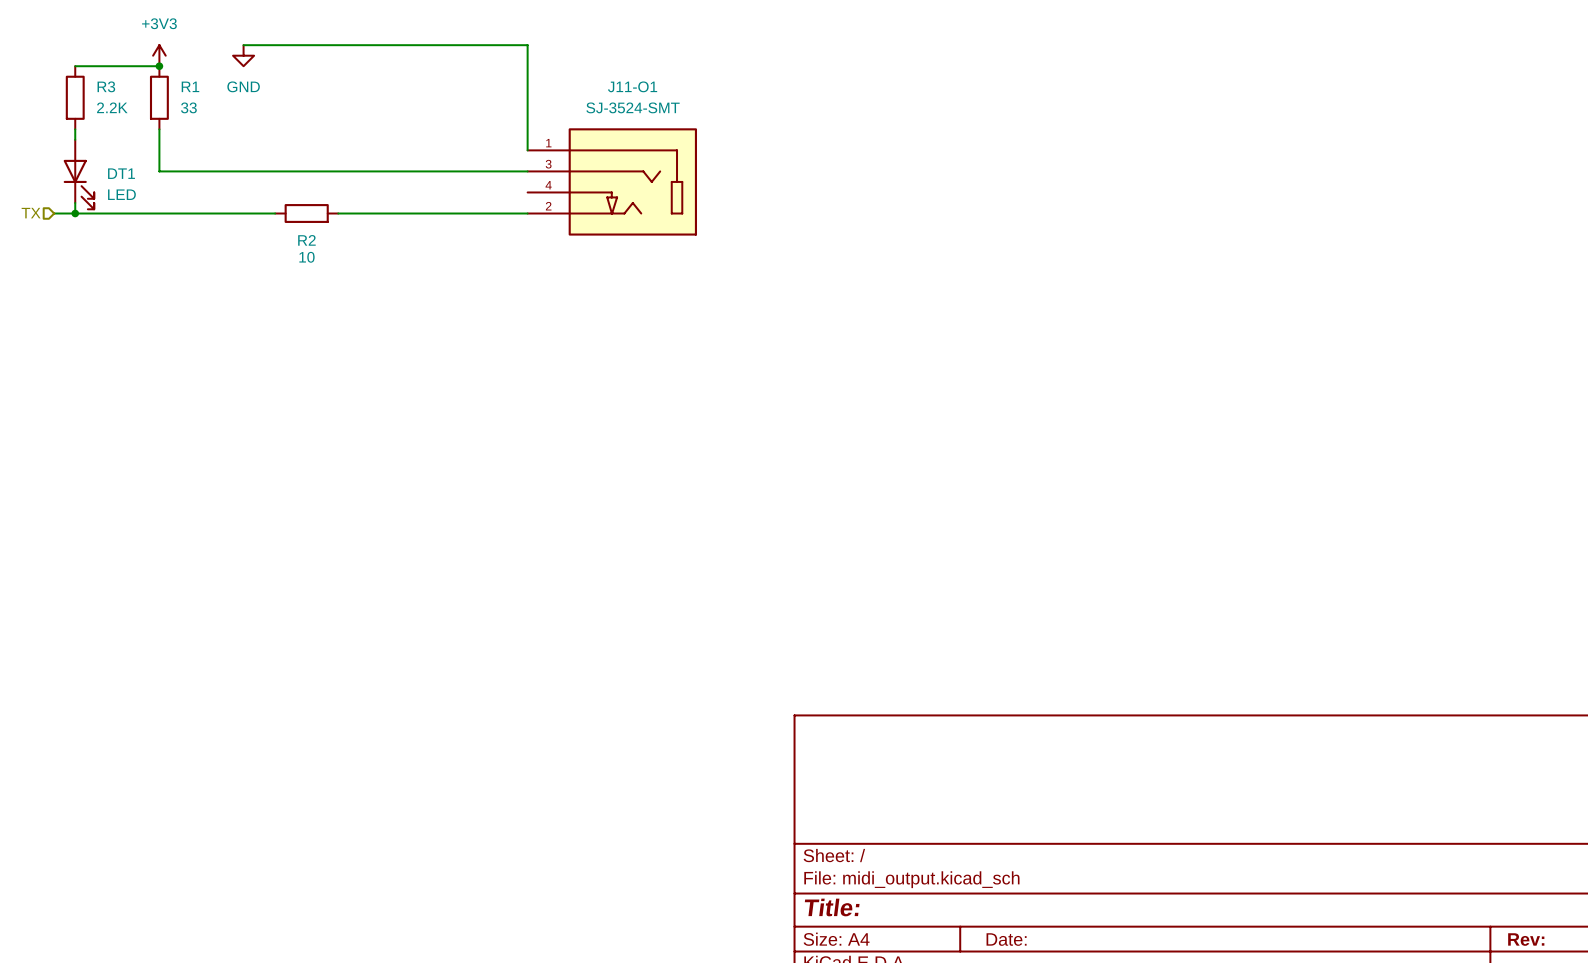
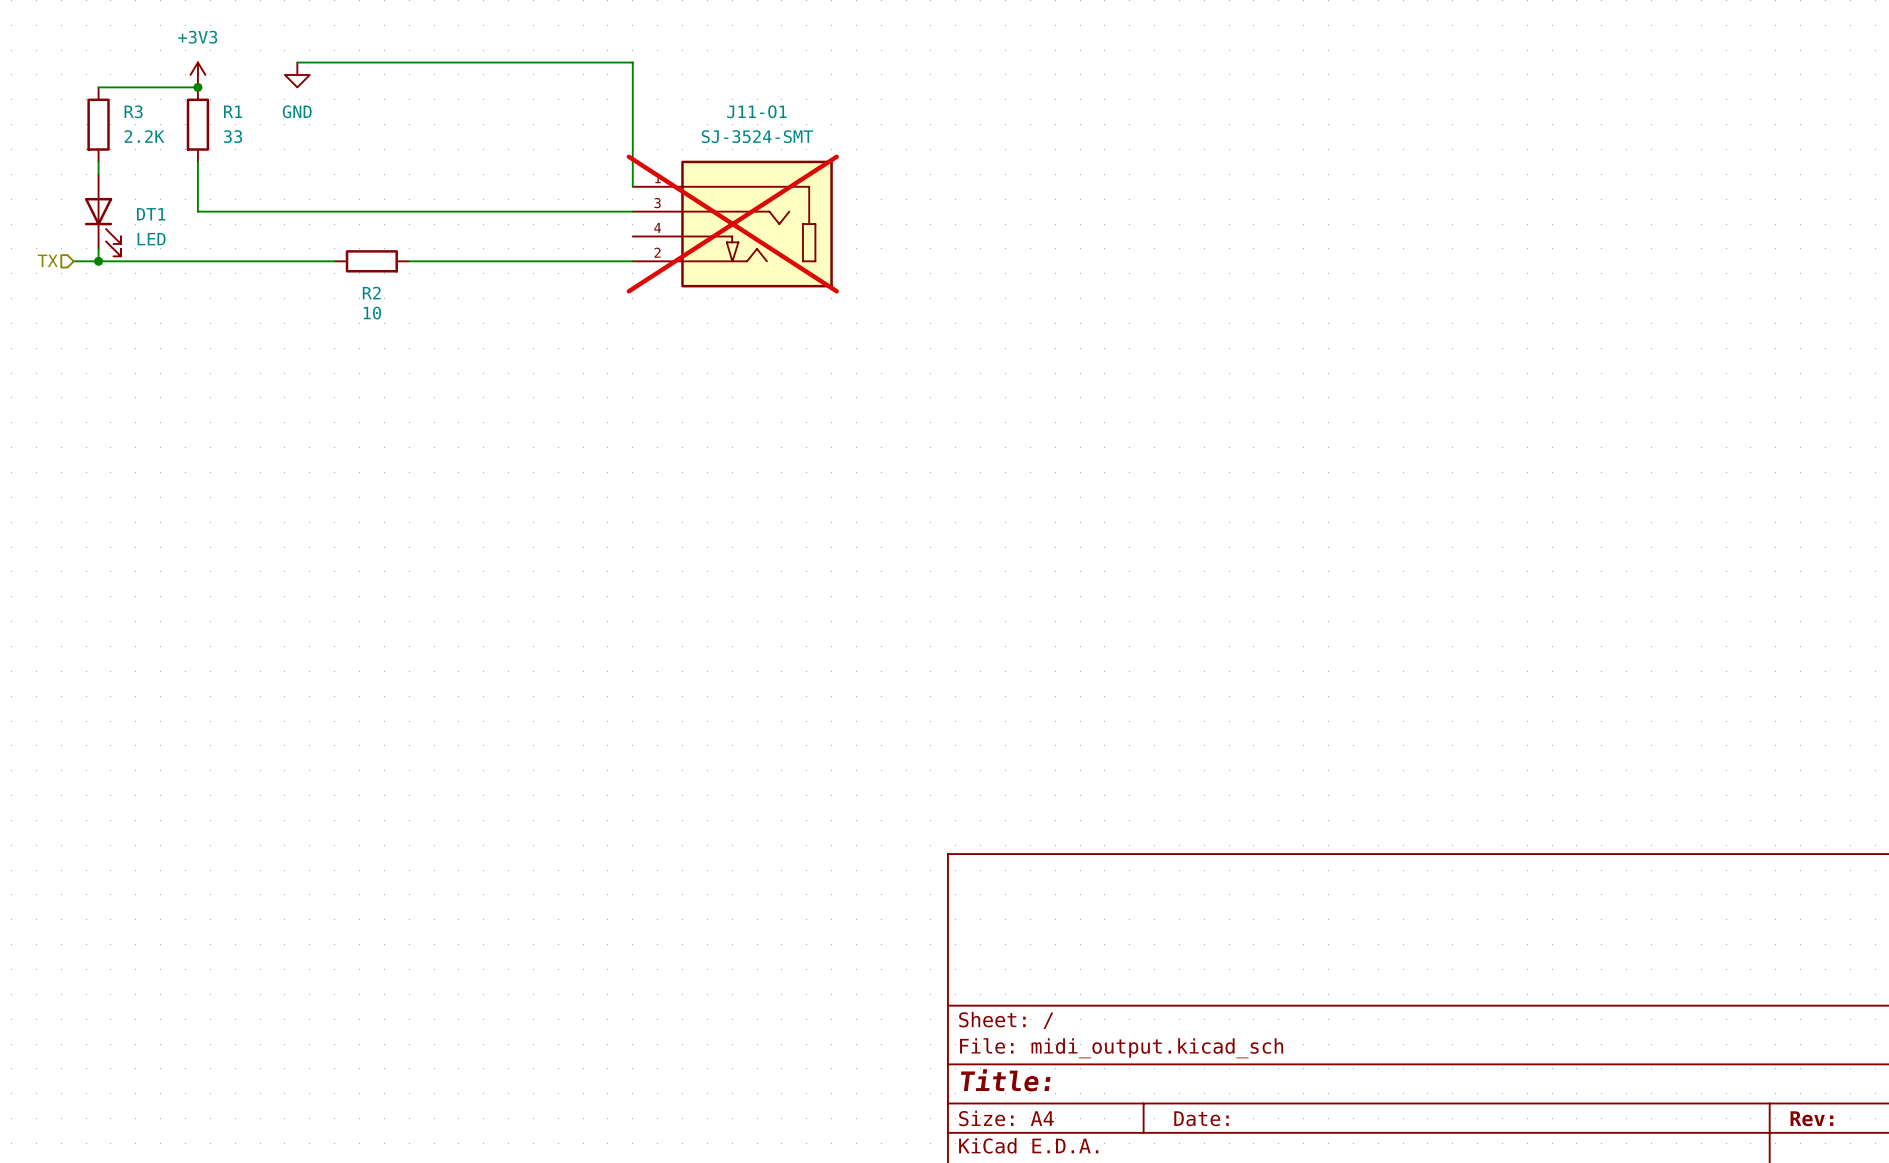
J11-O1 do-not-place cross: none -> (732, 224)

